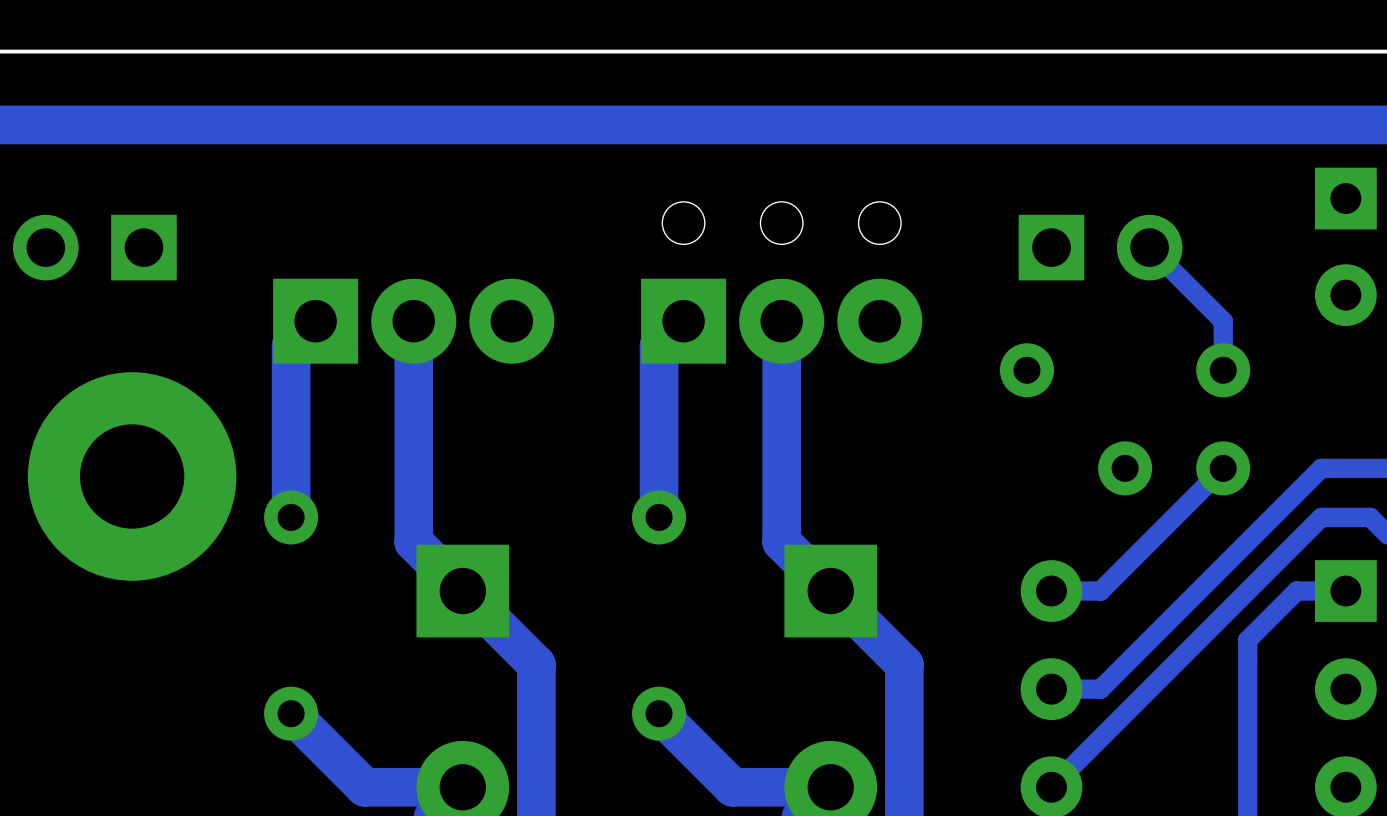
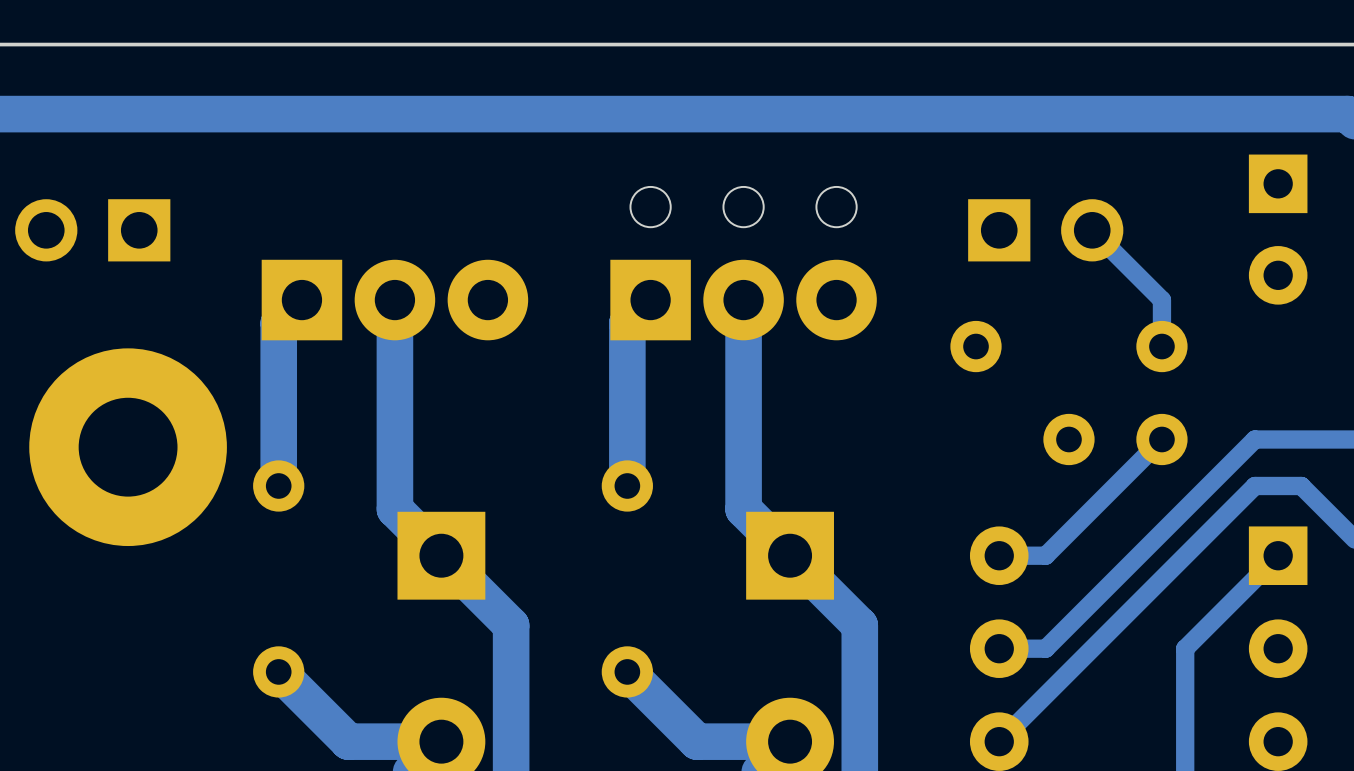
track: (1345, 591) (1296, 591) (1247, 640) (1247, 689) -> (1278, 555) (1185, 648)

